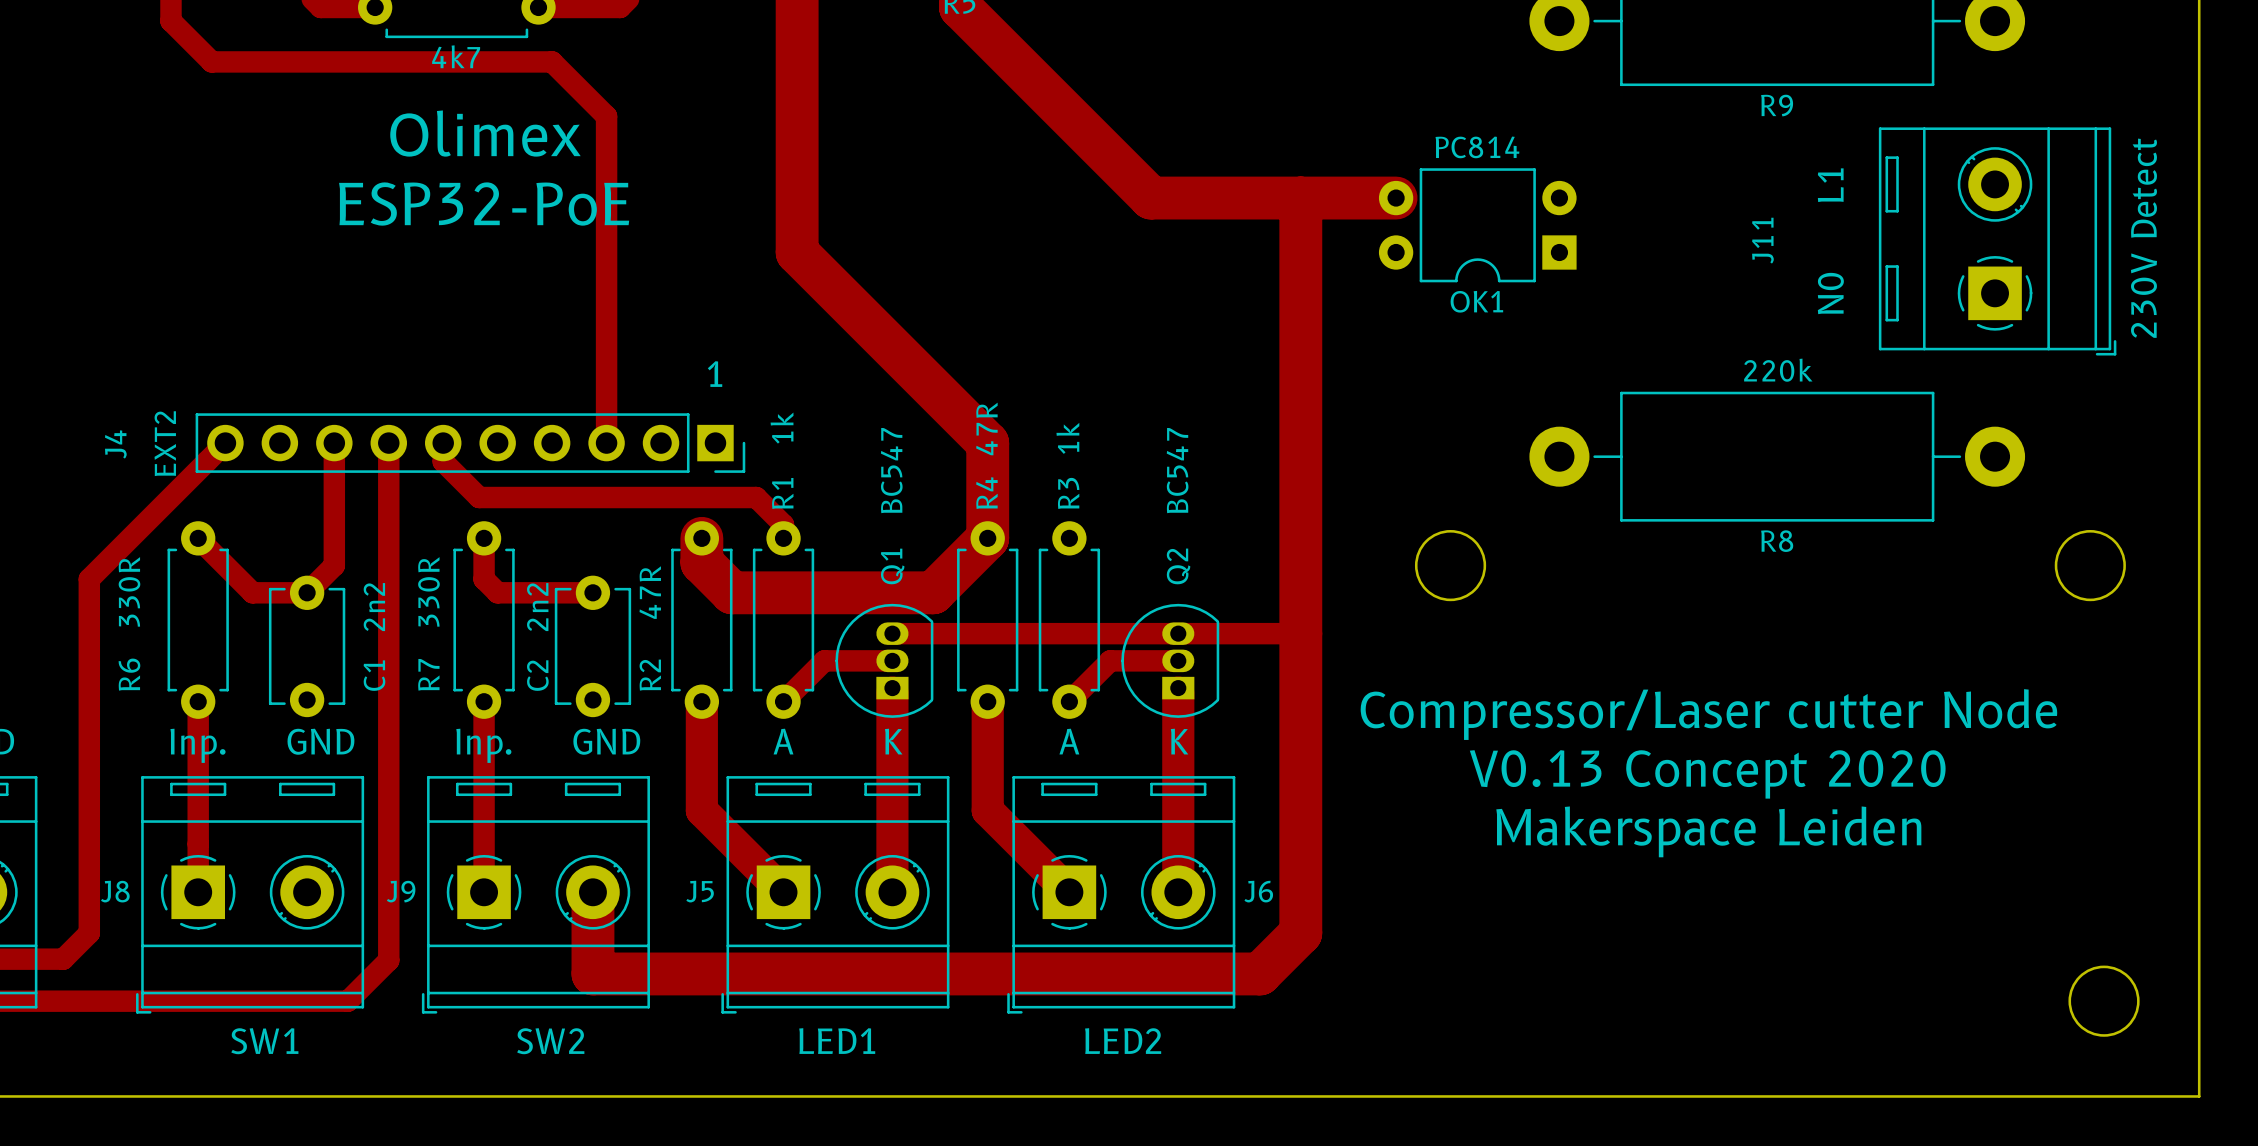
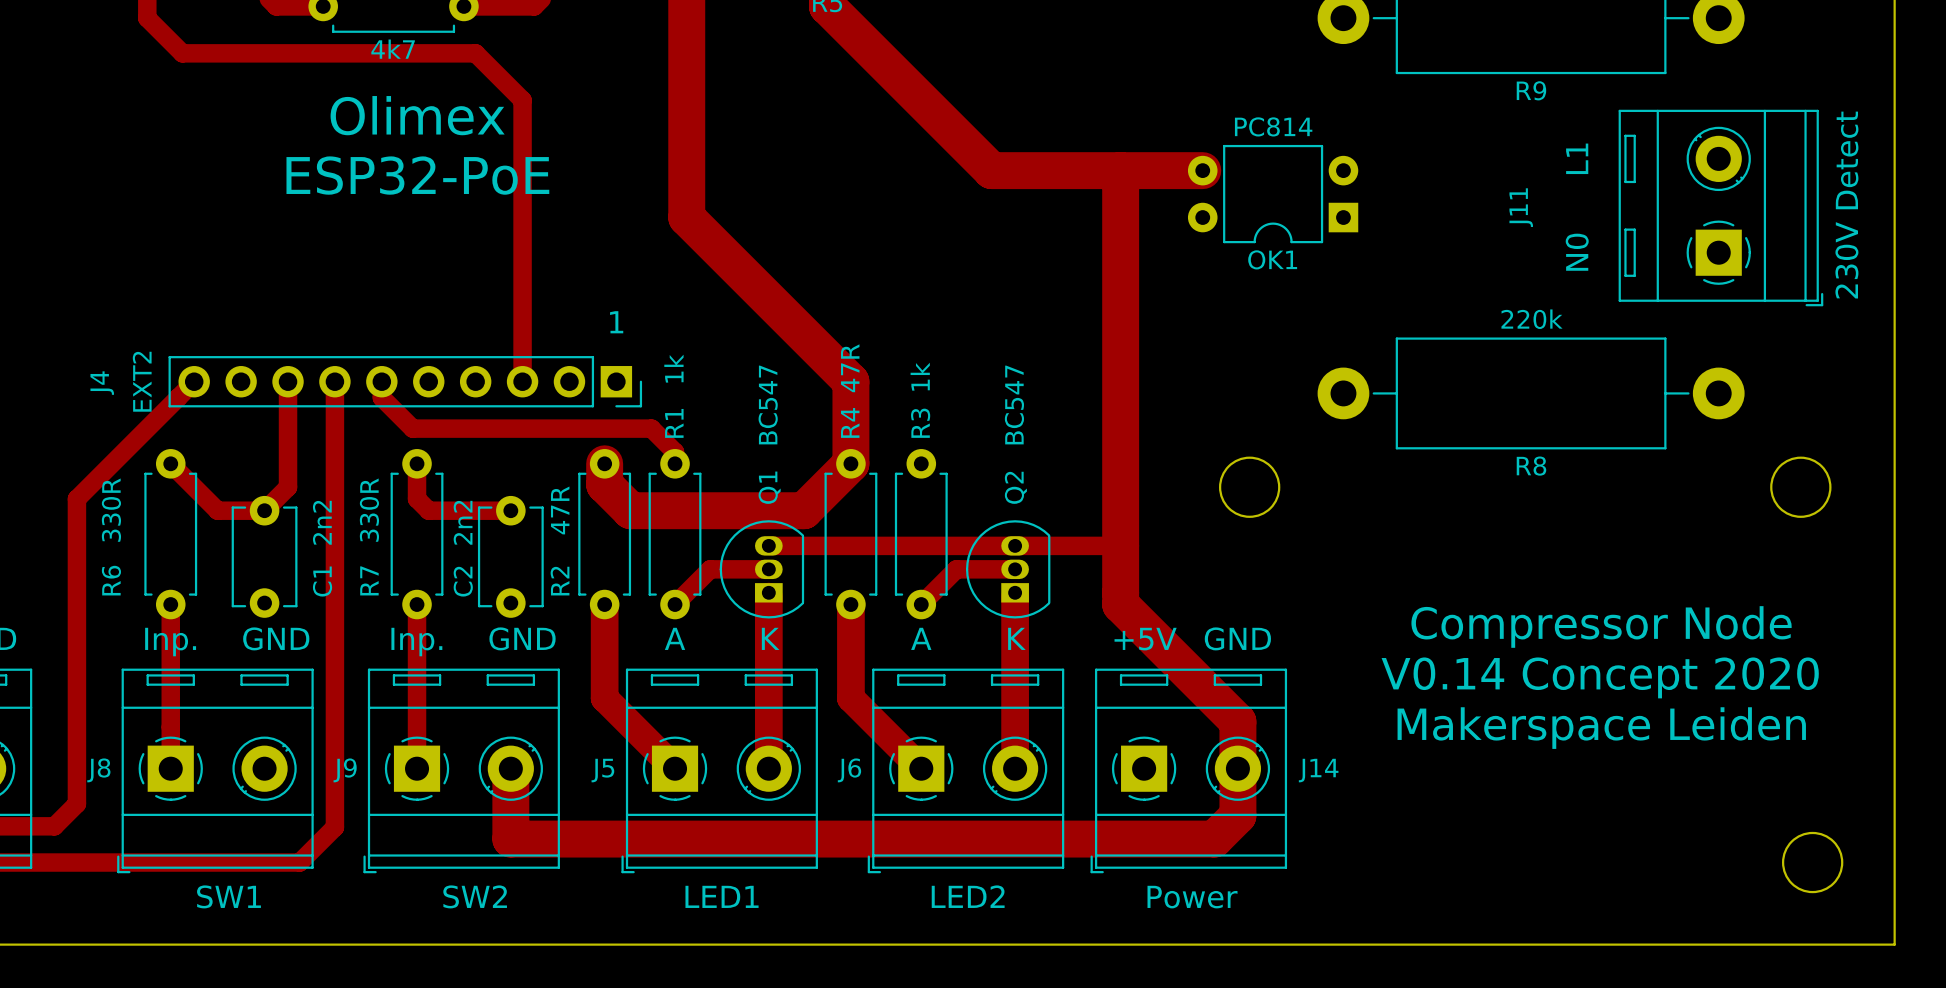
track: (1300, 701) (1300, 933) (1259, 973) -> (1120, 604) (1237, 721) (1237, 815) (1214, 839) (1085, 839)
text: Compressor/Laser cutter Node (1708, 714) -> Compressor Node (1601, 626)
text: none -> +5V (1145, 639)
text: none -> GND (1237, 638)
text: V0.13 Concept 2020 (1707, 774) -> V0.14 Concept 2020 (1600, 677)
text position: Makerspace Leiden (1708, 831) -> Makerspace Leiden (1601, 728)
J6 name position: J6 (1258, 891) -> J6 (849, 770)
J14: none -> (1188, 770)
text: none -> Power (1192, 897)

